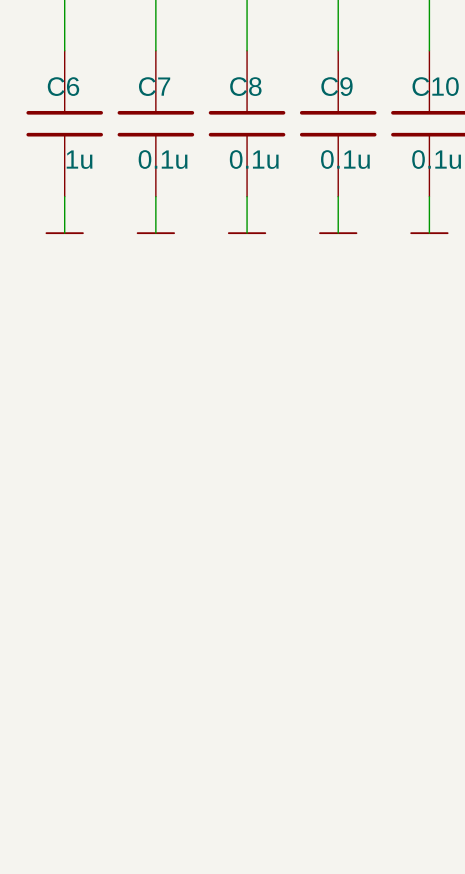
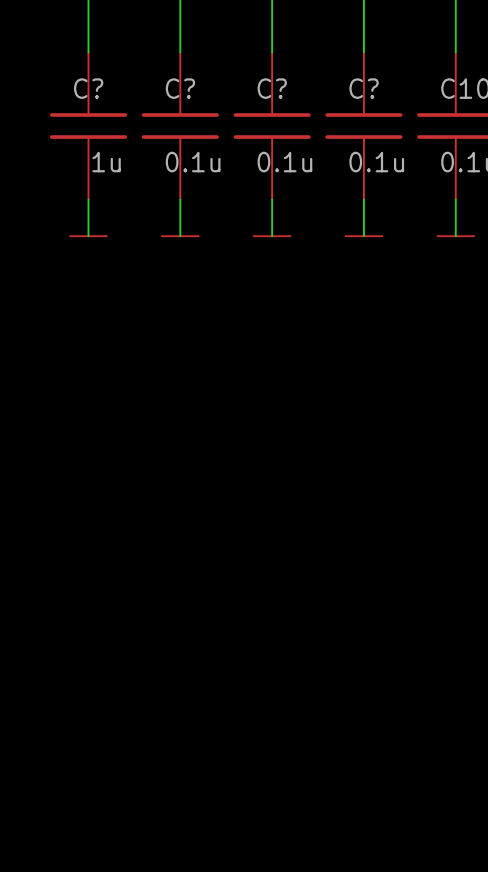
C6 name: C6 (63, 86) -> C? (88, 88)
C7 name: C7 (154, 86) -> C? (180, 88)
C8 name: C8 (245, 86) -> C? (272, 88)
C9 name: C9 (336, 86) -> C? (364, 88)

